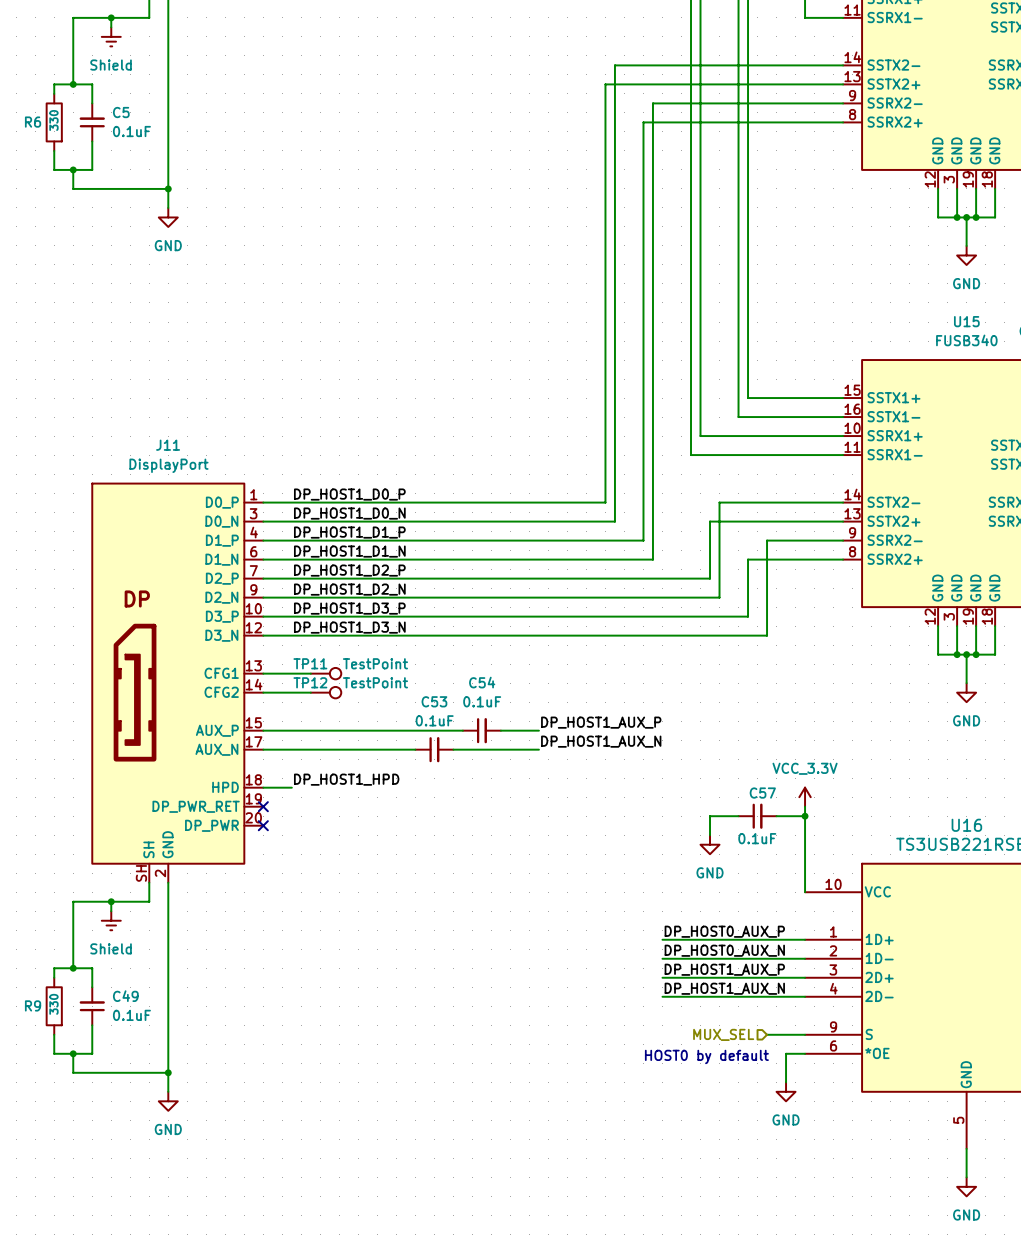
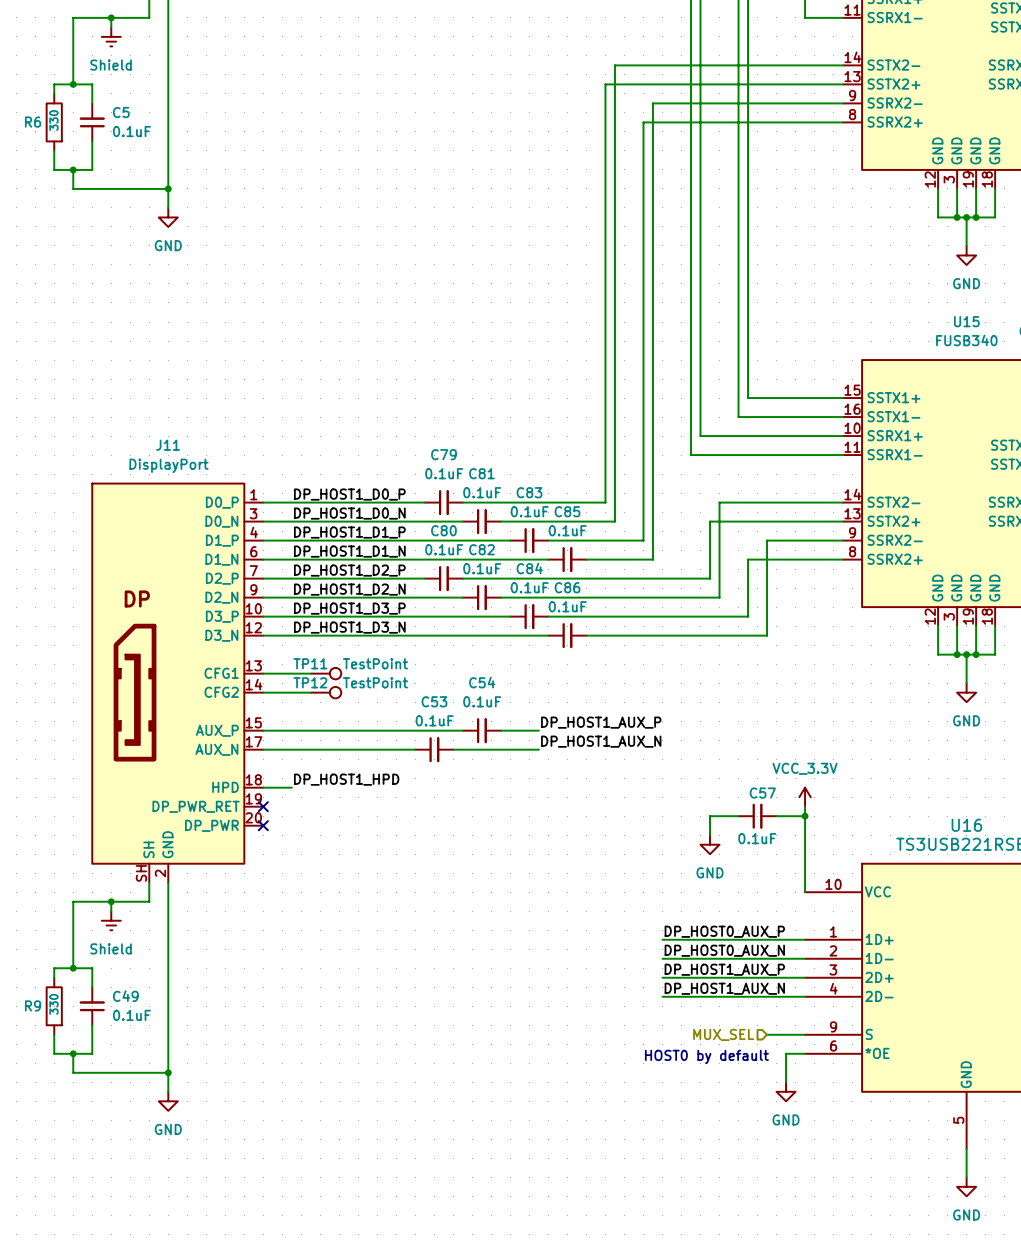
C79: none -> 0.1uF (443, 502)
C81: none -> 0.1uF (481, 521)
C83: none -> 0.1uF (529, 540)
C85: none -> 0.1uF (567, 559)
C80: none -> 0.1uF (443, 578)
C82: none -> 0.1uF (481, 597)
C84: none -> 0.1uF (529, 616)
C86: none -> 0.1uF (567, 635)

